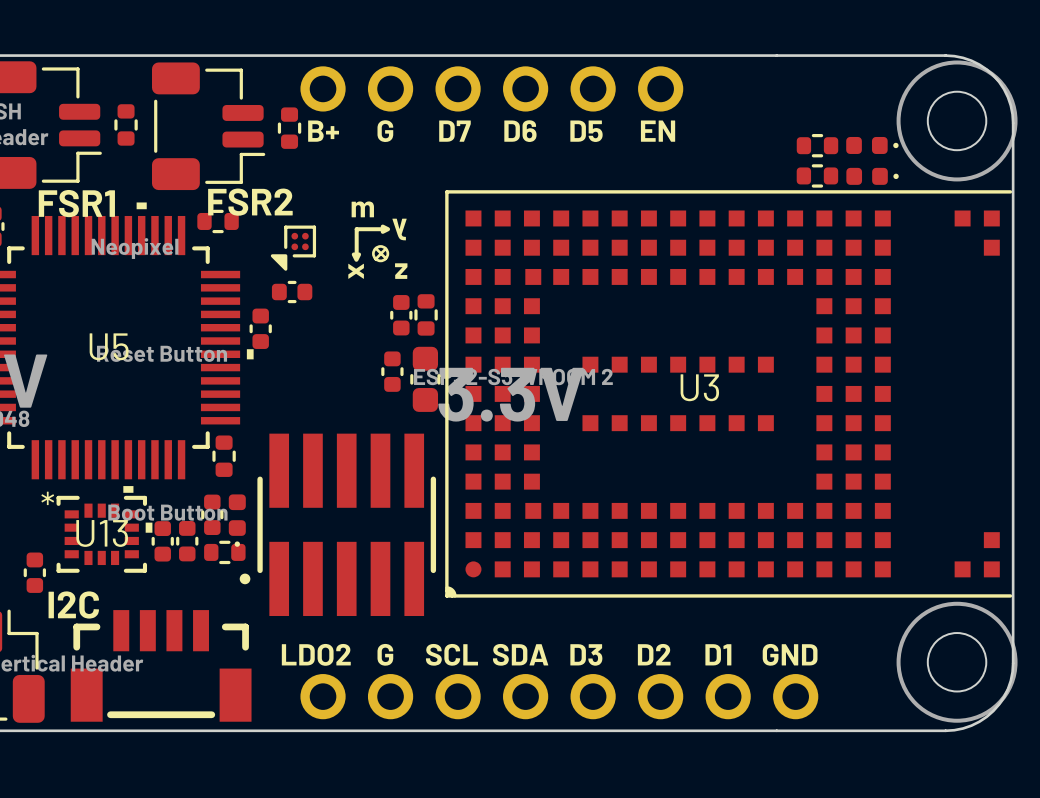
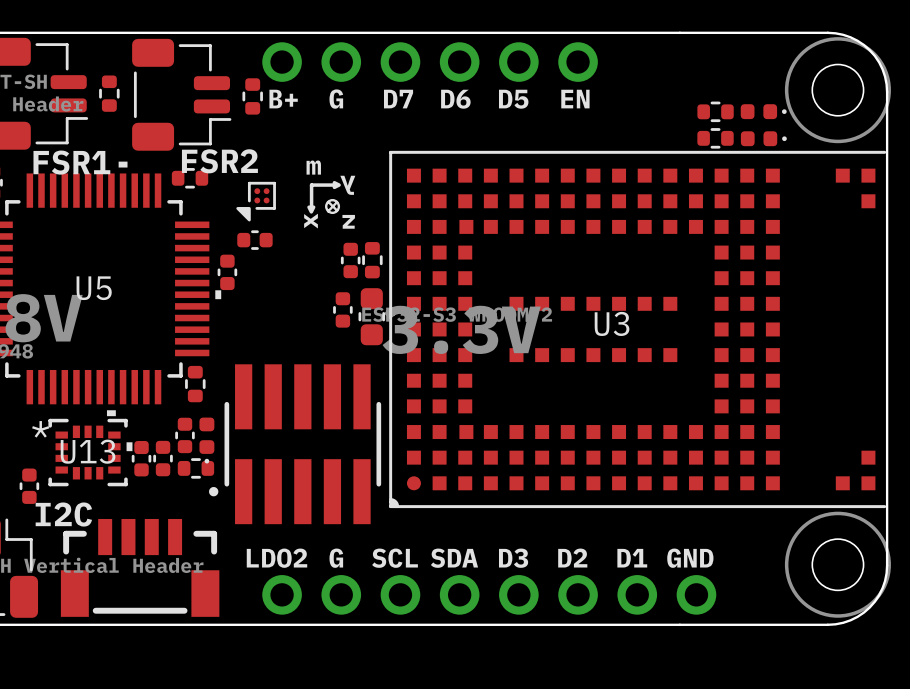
text: Neopixel (135, 248) -> none
text: Reset Button (162, 353) -> none
text: Boot Button (167, 512) -> none

